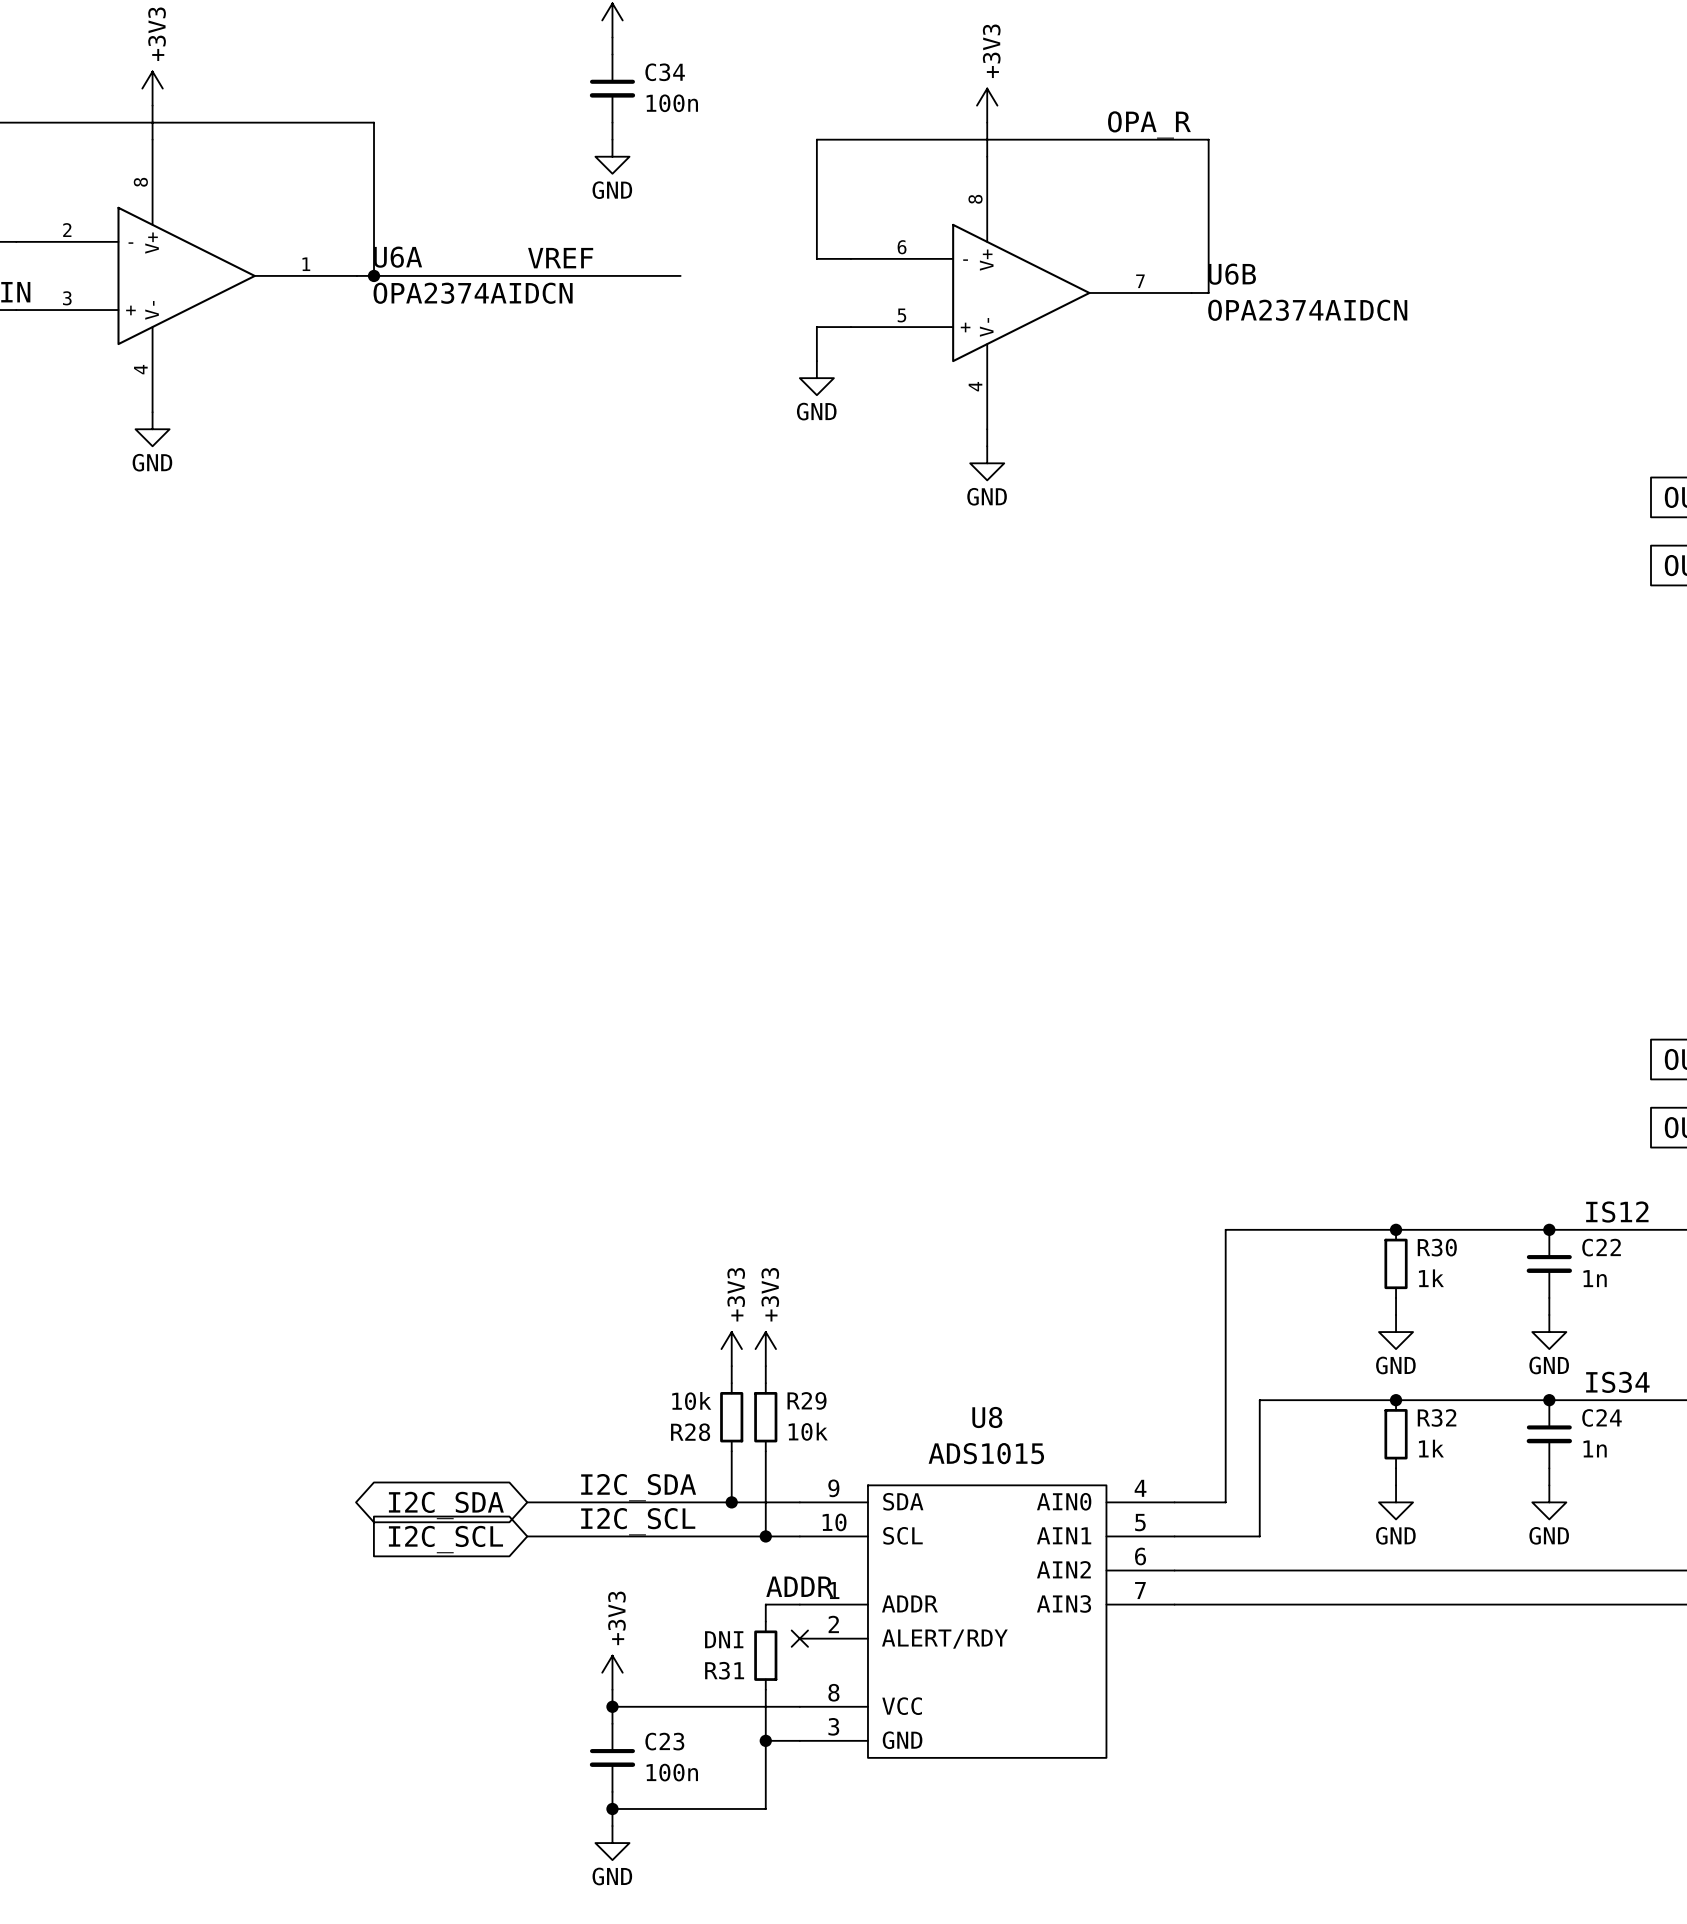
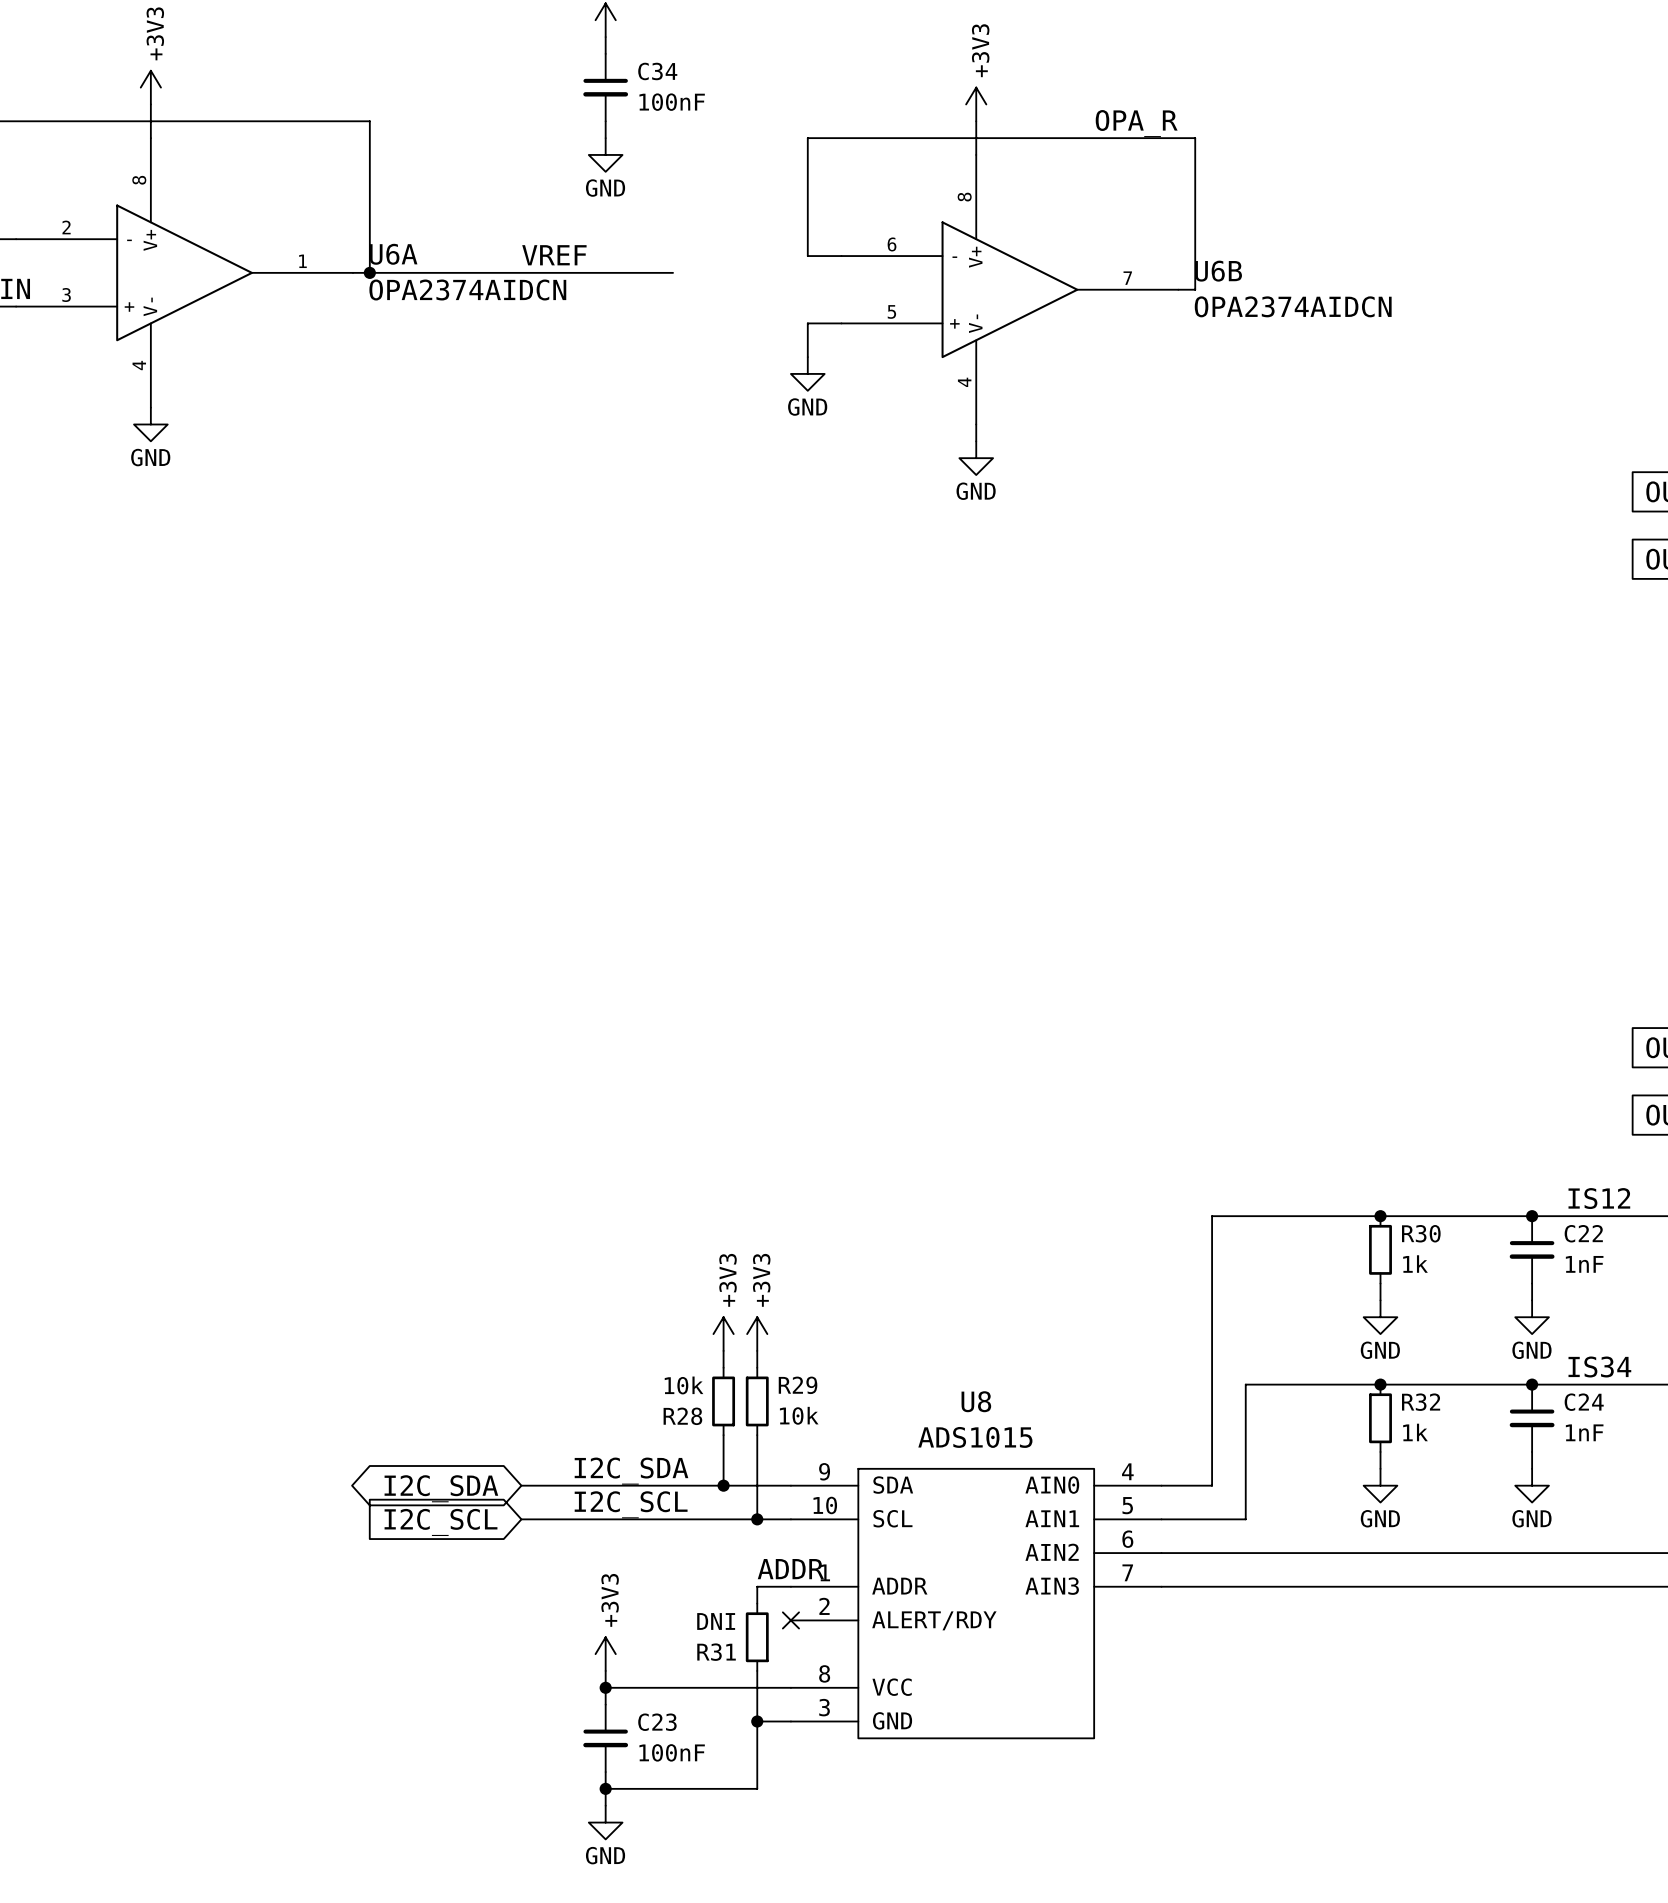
C34 value: 100n (672, 103) -> 100nF (672, 102)
C22 value: 1n (1595, 1278) -> 1nF (1584, 1264)
C24 value: 1n (1595, 1448) -> 1nF (1584, 1432)
C23 value: 100n (672, 1772) -> 100nF (672, 1752)

